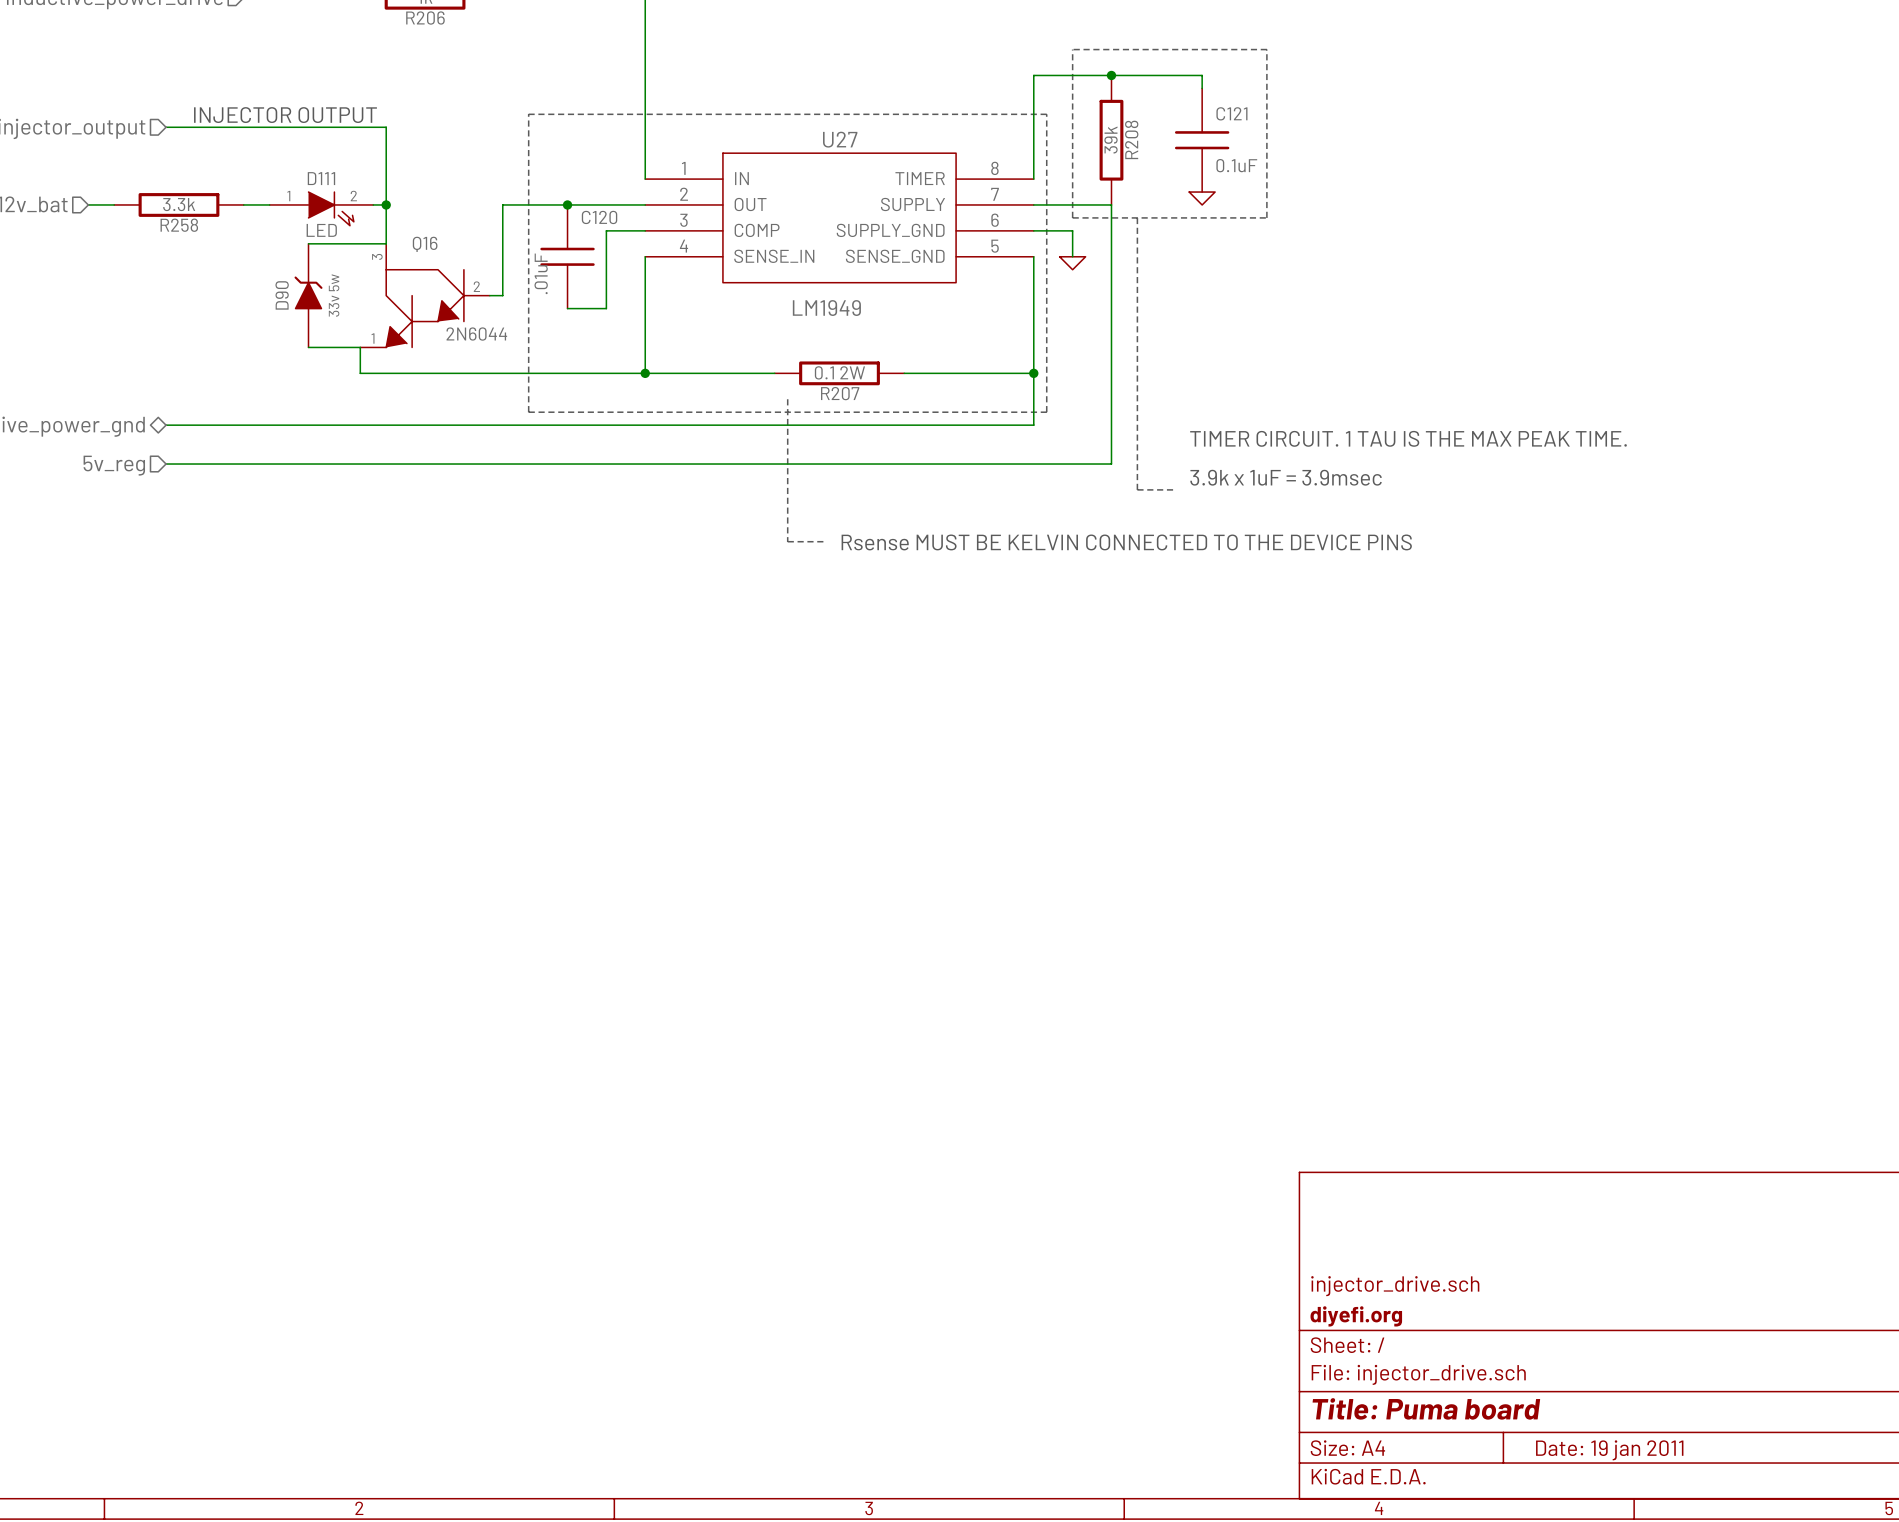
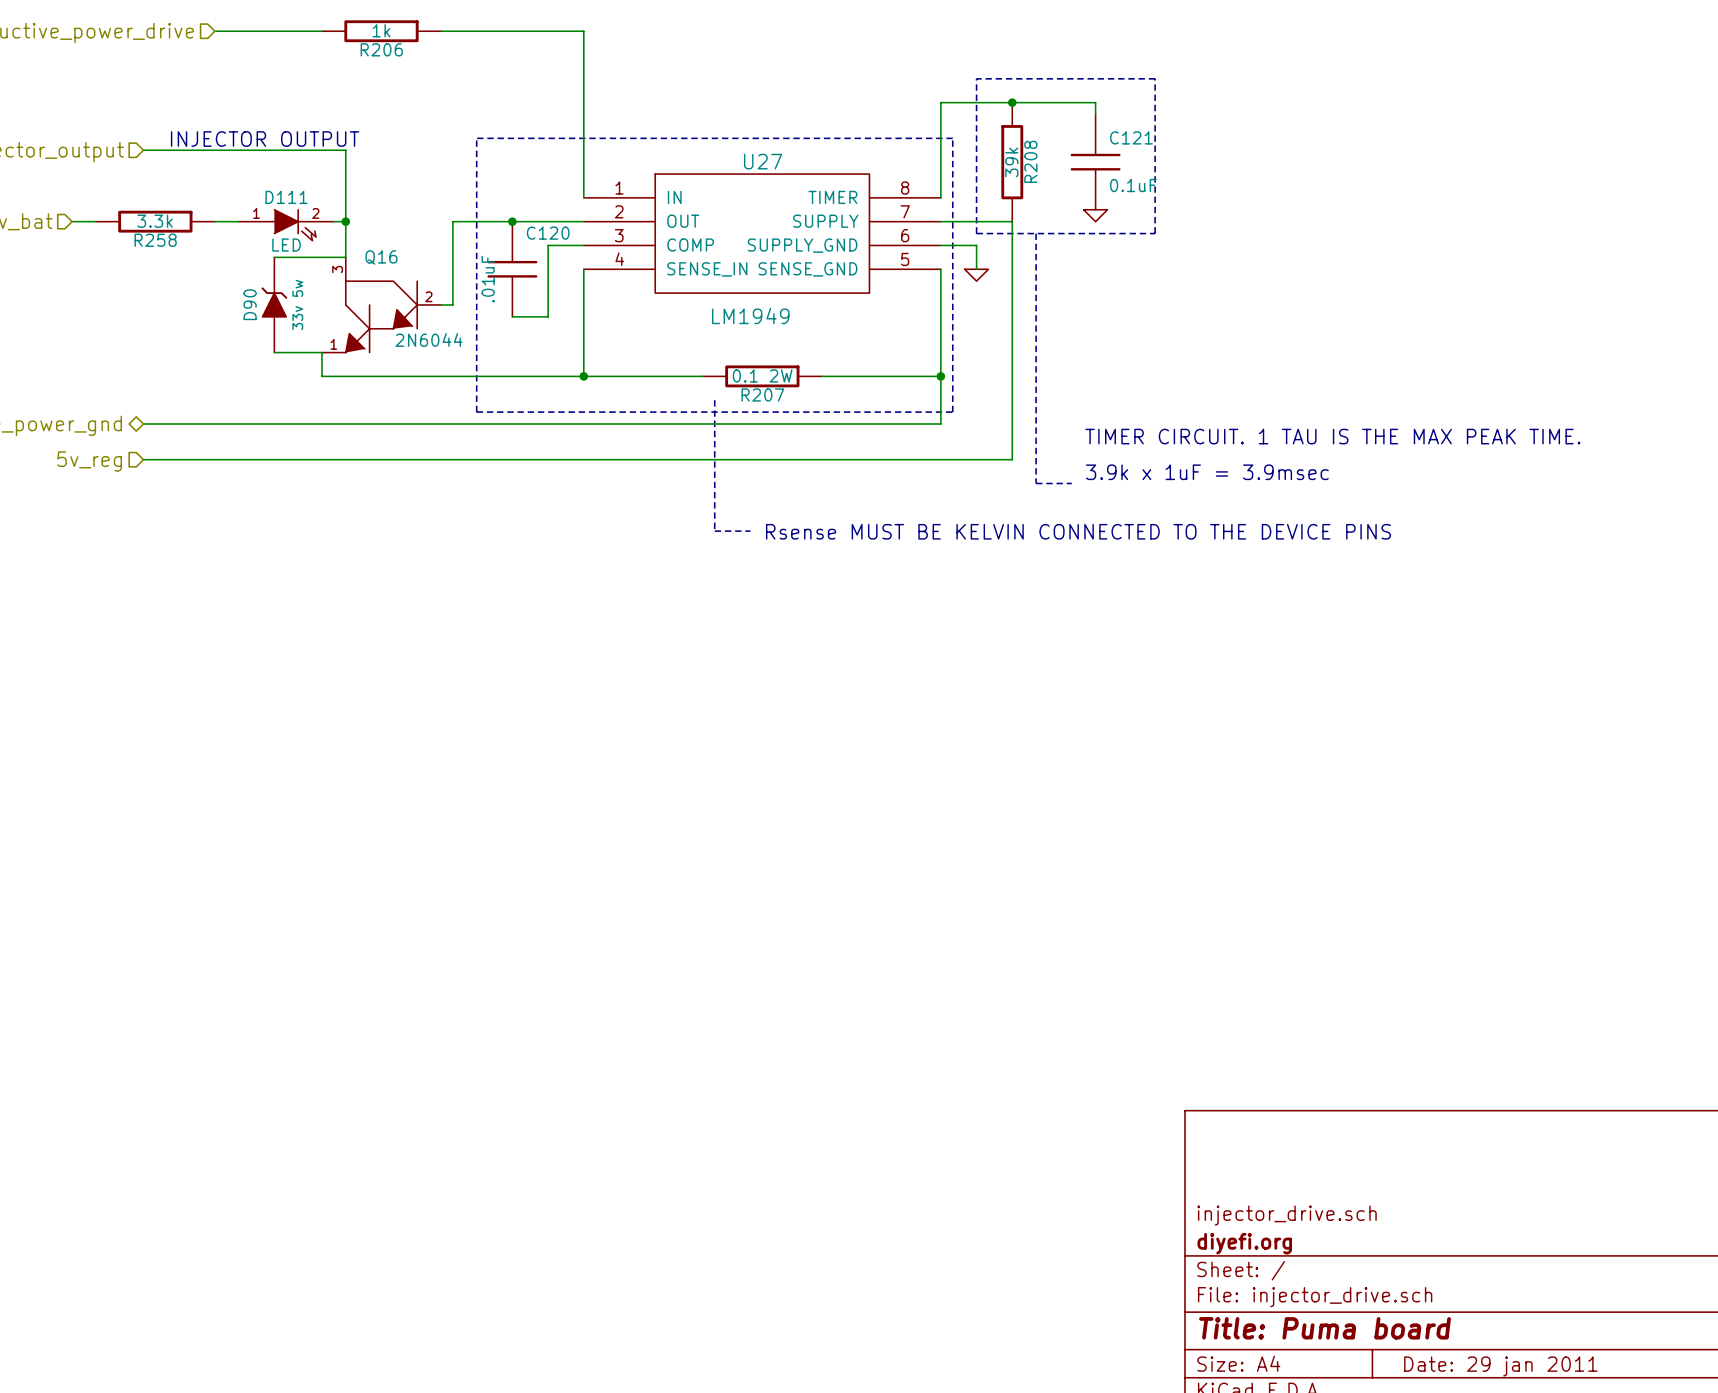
title block: Date: 19 jan 2011 (1609, 1450) -> Date: 29 jan 2011 (1500, 1366)

